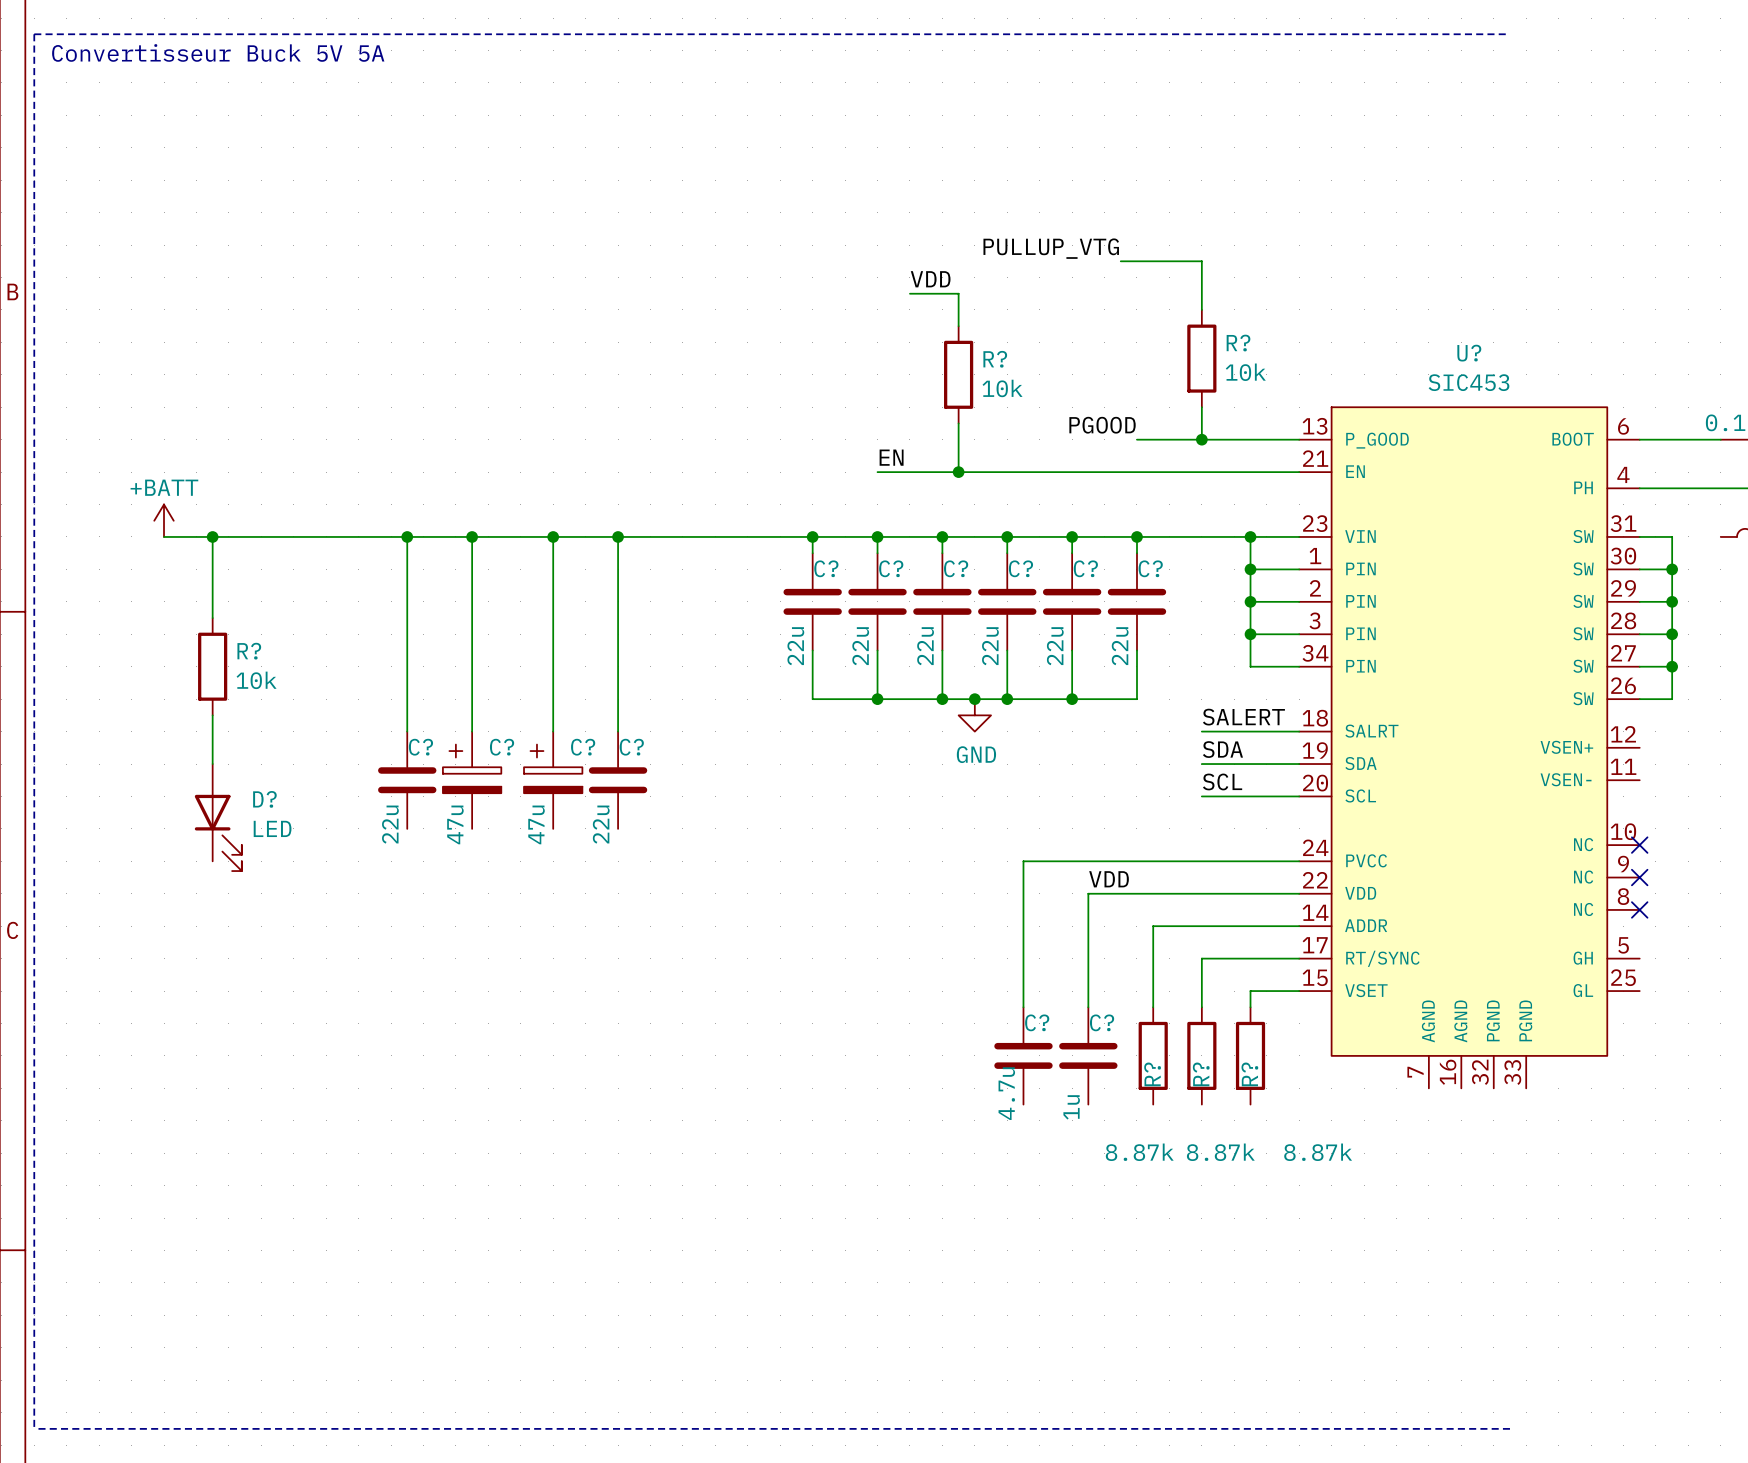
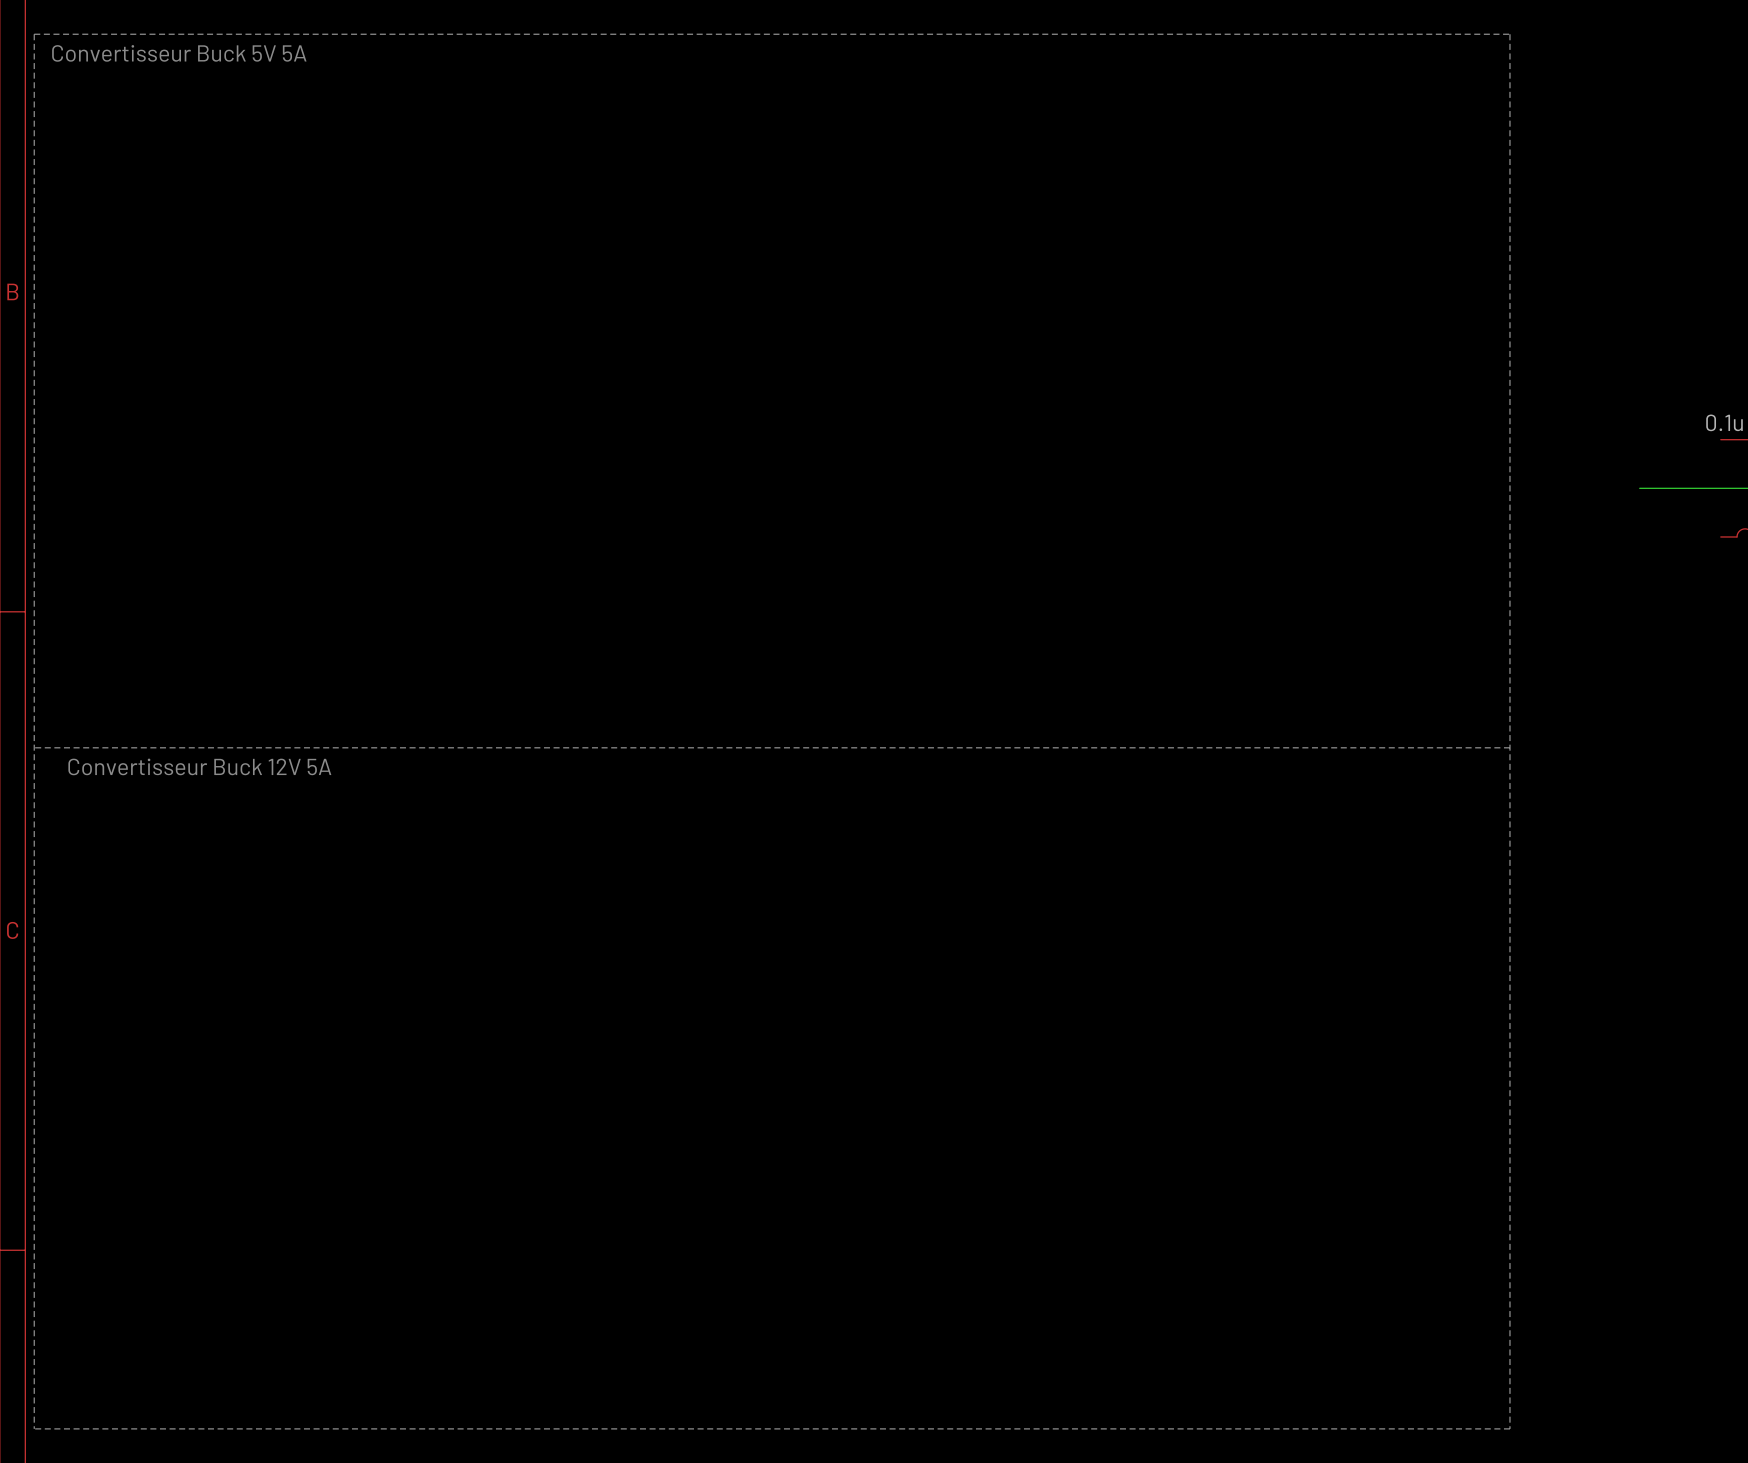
line: none -> (1509, 34) (1509, 1428)
label: PULLUP_VTG (1051, 248) -> none
wire: (1120, 261) (1201, 261) (1201, 309) -> none
label: VDD (930, 279) -> none
wire: (909, 293) (958, 293) (958, 326) -> none
R?: 10k (1201, 358) -> none
R?: 10k (958, 374) -> none
wire: (1201, 407) (1201, 439) -> none
wire: (958, 423) (958, 472) -> none
label: PGOOD (1102, 425) -> none
wire: (1136, 439) (1299, 439) -> none
junction: (1201, 439) -> none
wire: (1639, 439) (1720, 439) -> none
label: EN (891, 457) -> none
wire: (877, 472) (1299, 472) -> none
junction: (958, 472) -> none
power symbol: +BATT (164, 520) -> none
wire: (164, 536) (1299, 536) -> none
wire: (212, 536) (212, 618) -> none
junction: (212, 536) -> none
wire: (407, 536) (407, 731) -> none
junction: (407, 536) -> none
wire: (472, 536) (472, 731) -> none
junction: (472, 536) -> none
wire: (553, 536) (553, 731) -> none
junction: (553, 536) -> none
wire: (618, 536) (618, 731) -> none
junction: (618, 536) -> none
wire: (812, 536) (812, 553) -> none
junction: (812, 536) -> none
wire: (877, 536) (877, 553) -> none
junction: (877, 536) -> none
wire: (942, 536) (942, 553) -> none
junction: (942, 536) -> none
wire: (1007, 536) (1007, 553) -> none
junction: (1007, 536) -> none
wire: (1072, 536) (1072, 553) -> none
junction: (1072, 536) -> none
wire: (1136, 536) (1136, 553) -> none
junction: (1136, 536) -> none
wire: (1250, 536) (1250, 666) (1299, 666) -> none
junction: (1250, 536) -> none
wire: (1639, 536) (1672, 536) (1672, 699) (1639, 699) -> none
wire: (1250, 569) (1299, 569) -> none
junction: (1250, 569) -> none
wire: (1639, 569) (1672, 569) -> none
junction: (1672, 569) -> none
C?: 22u (812, 601) -> none
C?: 22u (877, 601) -> none
C?: 22u (942, 601) -> none
C?: 22u (1007, 601) -> none
C?: 22u (1072, 601) -> none
C?: 22u (1136, 601) -> none
wire: (1250, 601) (1299, 601) -> none
junction: (1250, 601) -> none
wire: (1639, 601) (1672, 601) -> none
junction: (1672, 601) -> none
wire: (1250, 634) (1299, 634) -> none
junction: (1250, 634) -> none
wire: (1639, 634) (1672, 634) -> none
junction: (1672, 634) -> none
wire: (812, 650) (812, 699) (1136, 699) (1136, 650) -> none
wire: (877, 650) (877, 699) -> none
wire: (942, 650) (942, 699) -> none
wire: (1007, 650) (1007, 699) -> none
wire: (1072, 650) (1072, 699) -> none
R?: 10k (212, 666) -> none
wire: (1639, 666) (1672, 666) -> none
junction: (1672, 666) -> none
junction: (877, 699) -> none
junction: (942, 699) -> none
junction: (974, 699) -> none
junction: (1007, 699) -> none
junction: (1072, 699) -> none
wire: (212, 715) (212, 764) -> none
power symbol: GND (974, 715) -> none
label: SALERT (1243, 717) -> none
wire: (1201, 731) (1299, 731) -> none
line: none -> (34, 747) (1509, 747)
U?: SIC453 (1469, 747) -> none
label: SDA (1222, 749) -> none
wire: (1201, 764) (1299, 764) -> none
text: none -> Convertisseur Buck 12V 5A (199, 766)
C?: 22u (407, 780) -> none
C?: 47u (472, 780) -> none
C?: 47u (553, 780) -> none
C?: 22u (618, 780) -> none
label: SCL (1222, 781) -> none
wire: (1201, 796) (1299, 796) -> none
D?: LED (218, 817) -> none
no-connect mark: (1639, 845) -> none
wire: (1299, 861) (1023, 861) (1023, 1007) -> none
no-connect mark: (1639, 877) -> none
label: VDD (1109, 879) -> none
wire: (1299, 893) (1088, 893) (1088, 1007) -> none
no-connect mark: (1639, 909) -> none
wire: (1299, 926) (1153, 926) (1153, 1007) -> none
wire: (1299, 958) (1201, 958) (1201, 1007) -> none
wire: (1299, 991) (1250, 991) (1250, 1007) -> none
C?: 4.7u (1023, 1055) -> none
C?: 1u (1088, 1055) -> none
R?: 8.87k (1153, 1055) -> none
R?: 8.87k (1201, 1055) -> none
R?: 8.87k (1250, 1055) -> none

